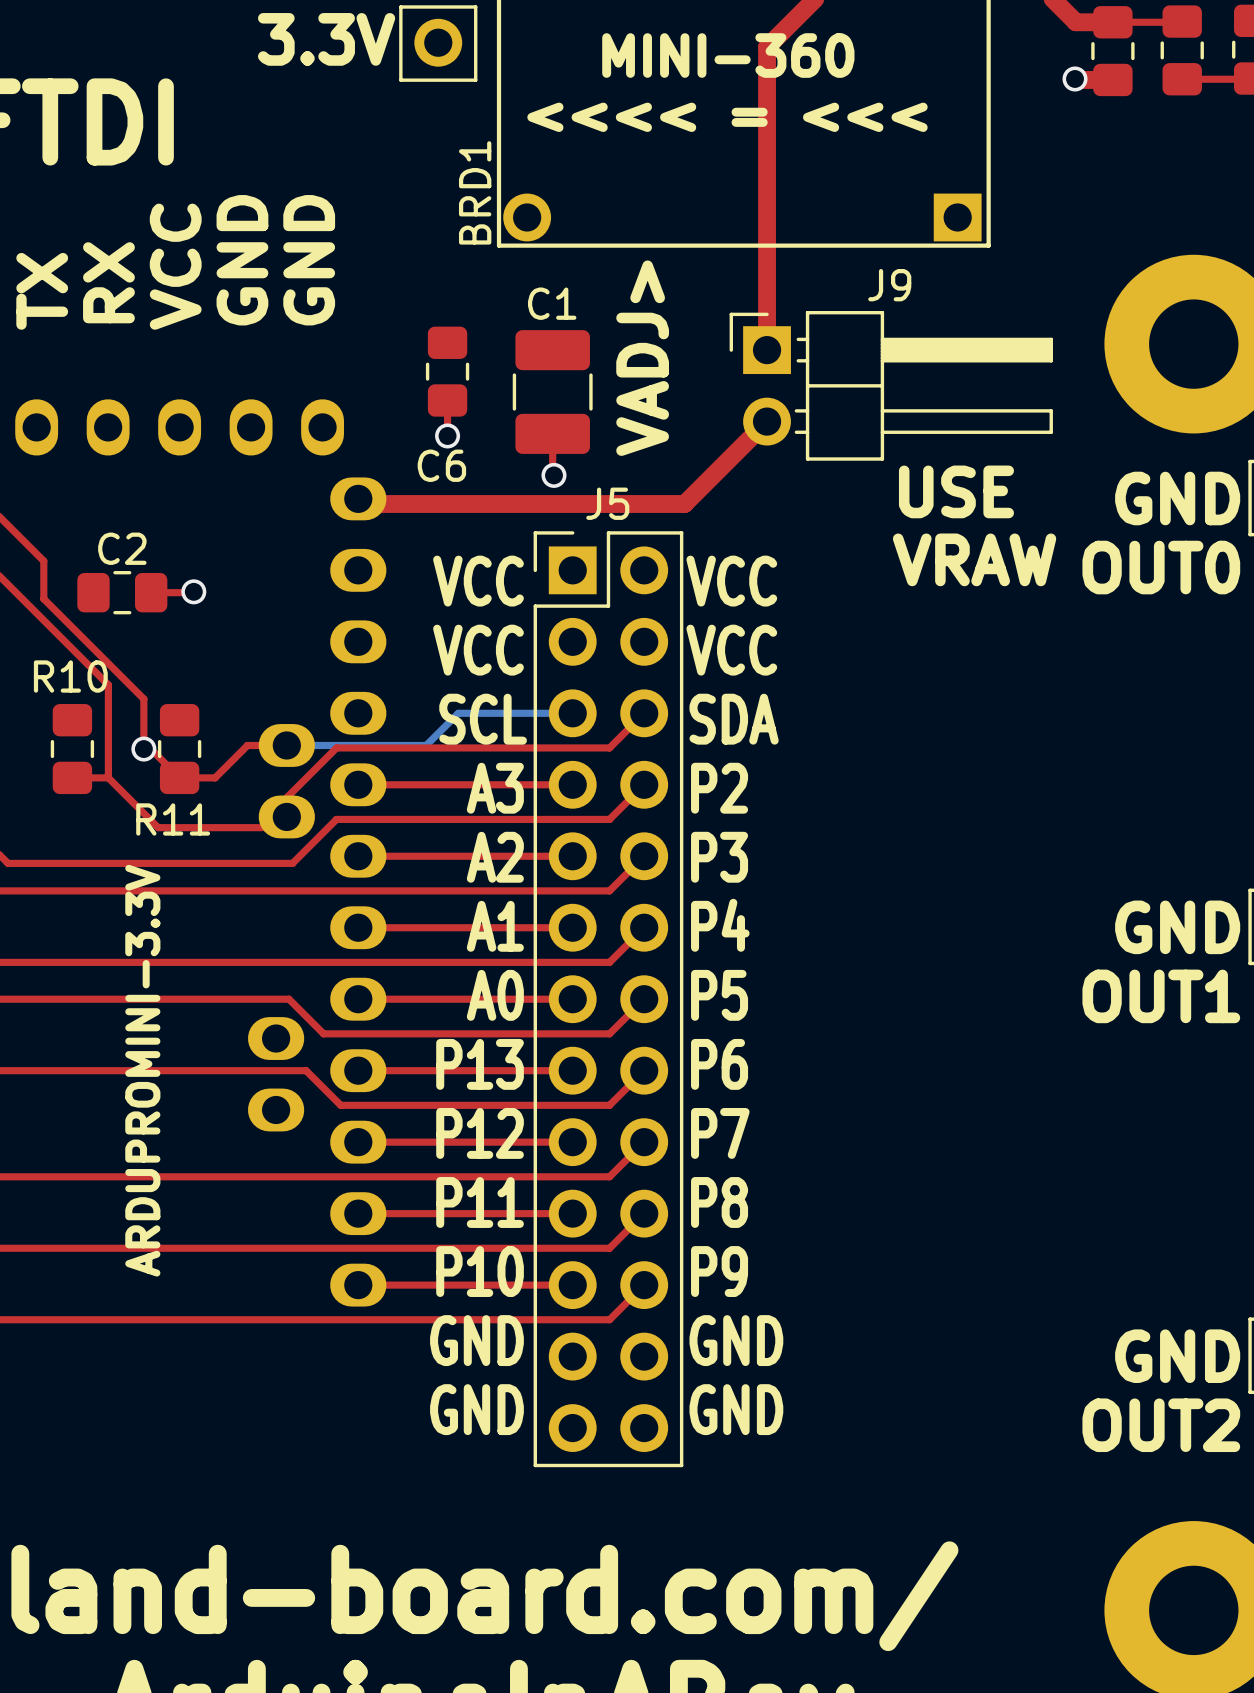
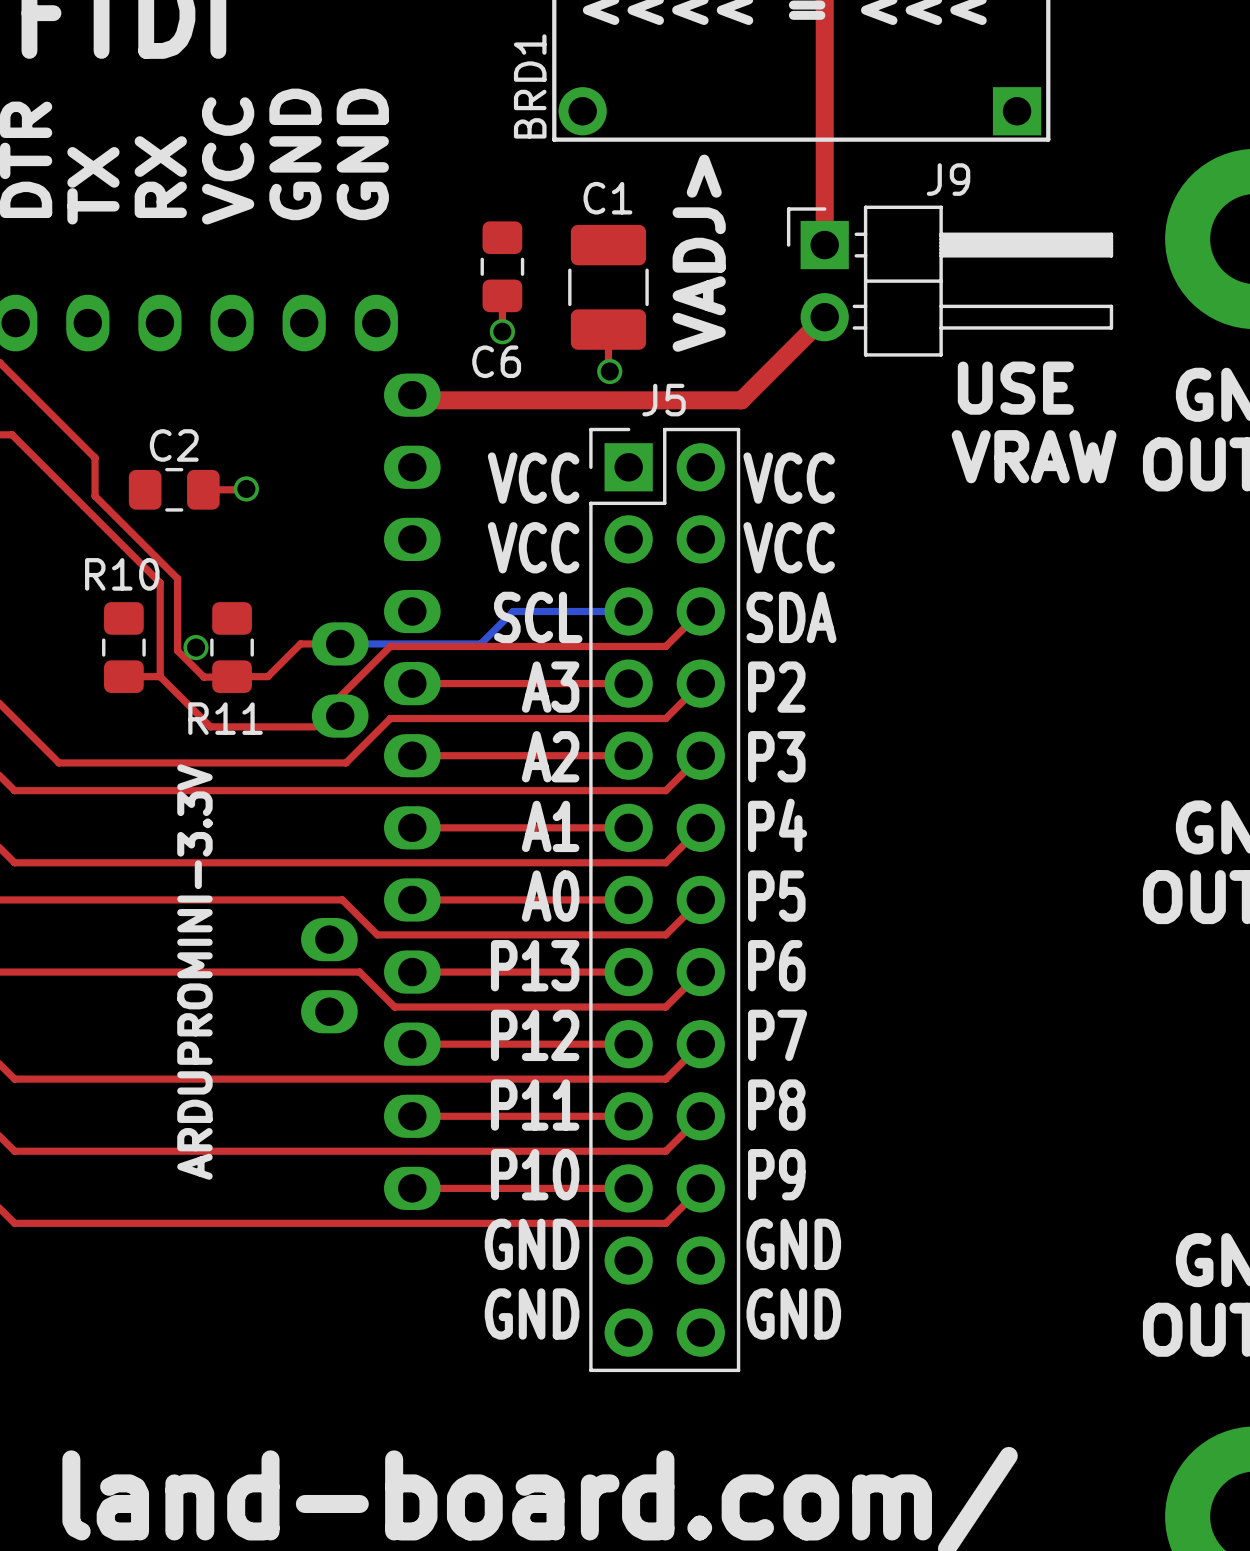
top track: (125, 680) (143, 699) (143, 749) (150, 749) (179, 777) -> (177, 578) (177, 650) (203, 677) (232, 676)

